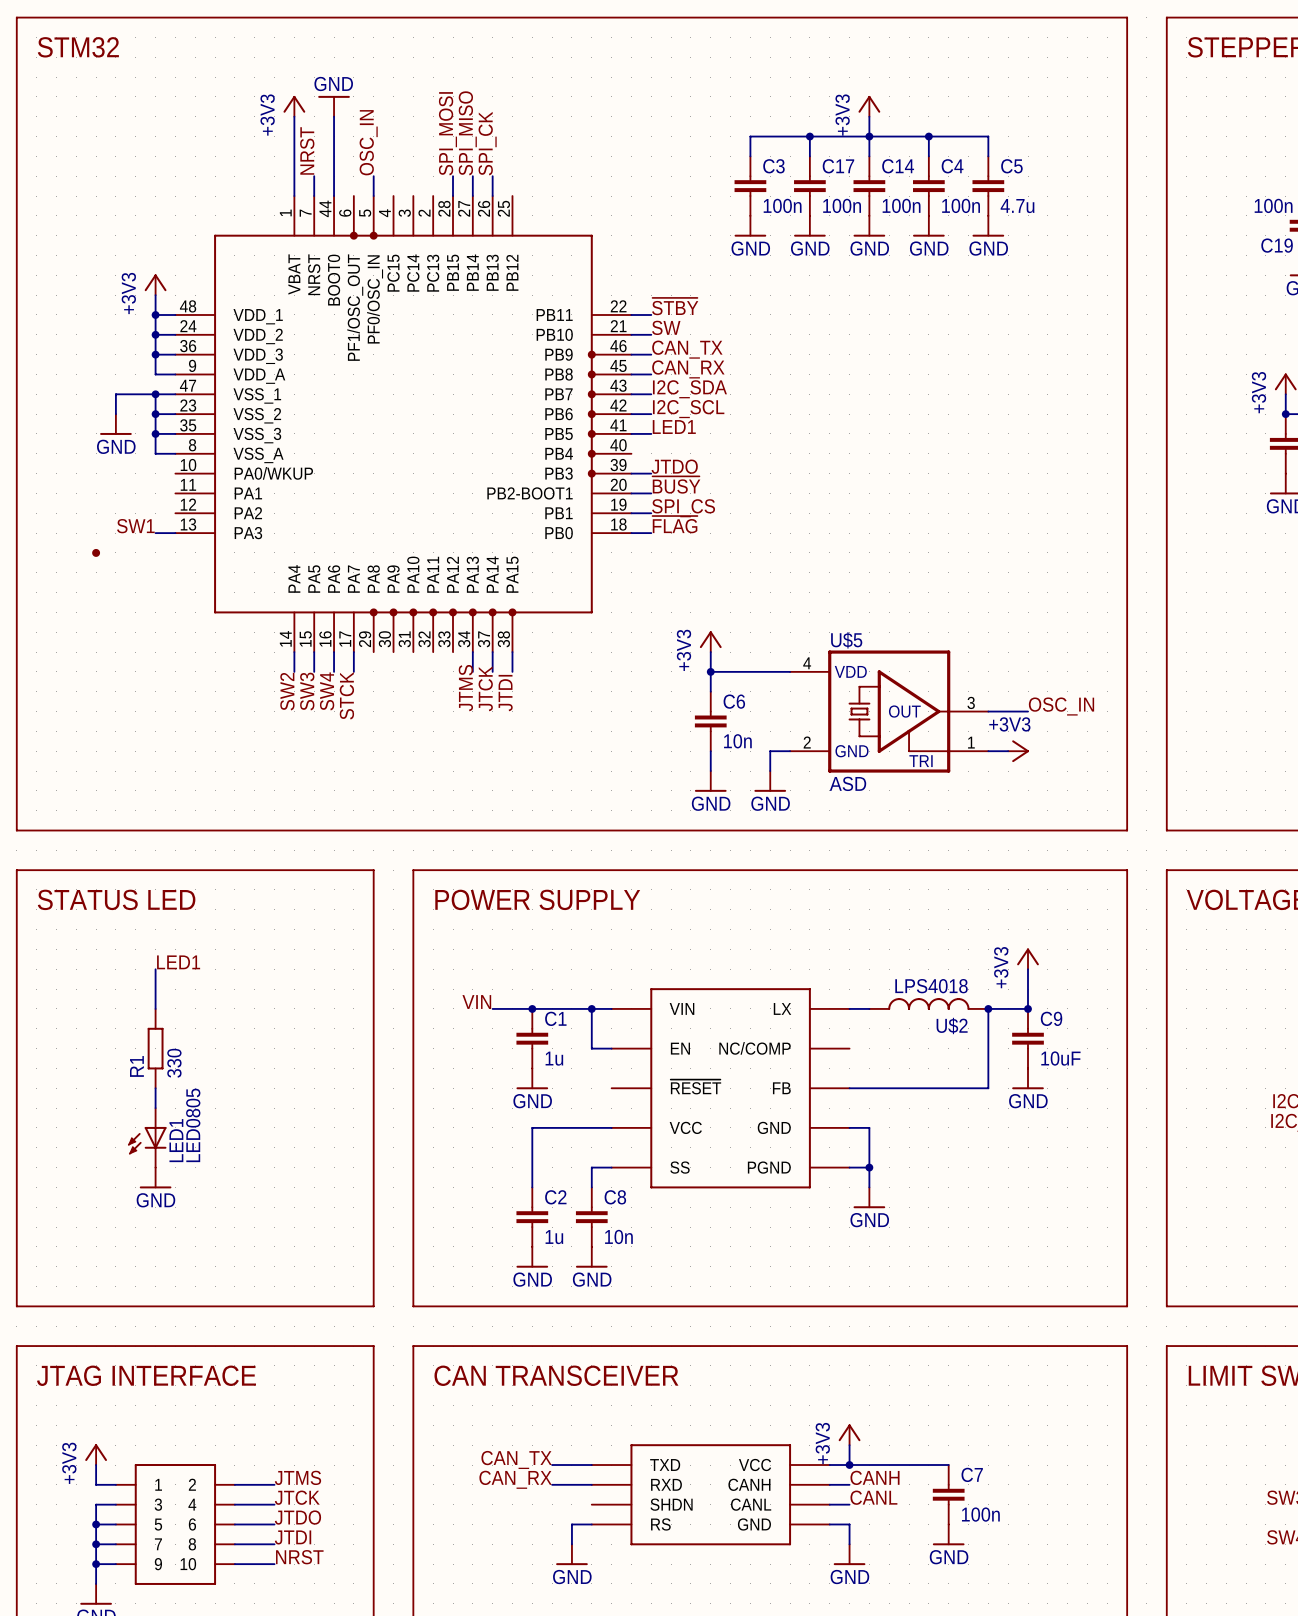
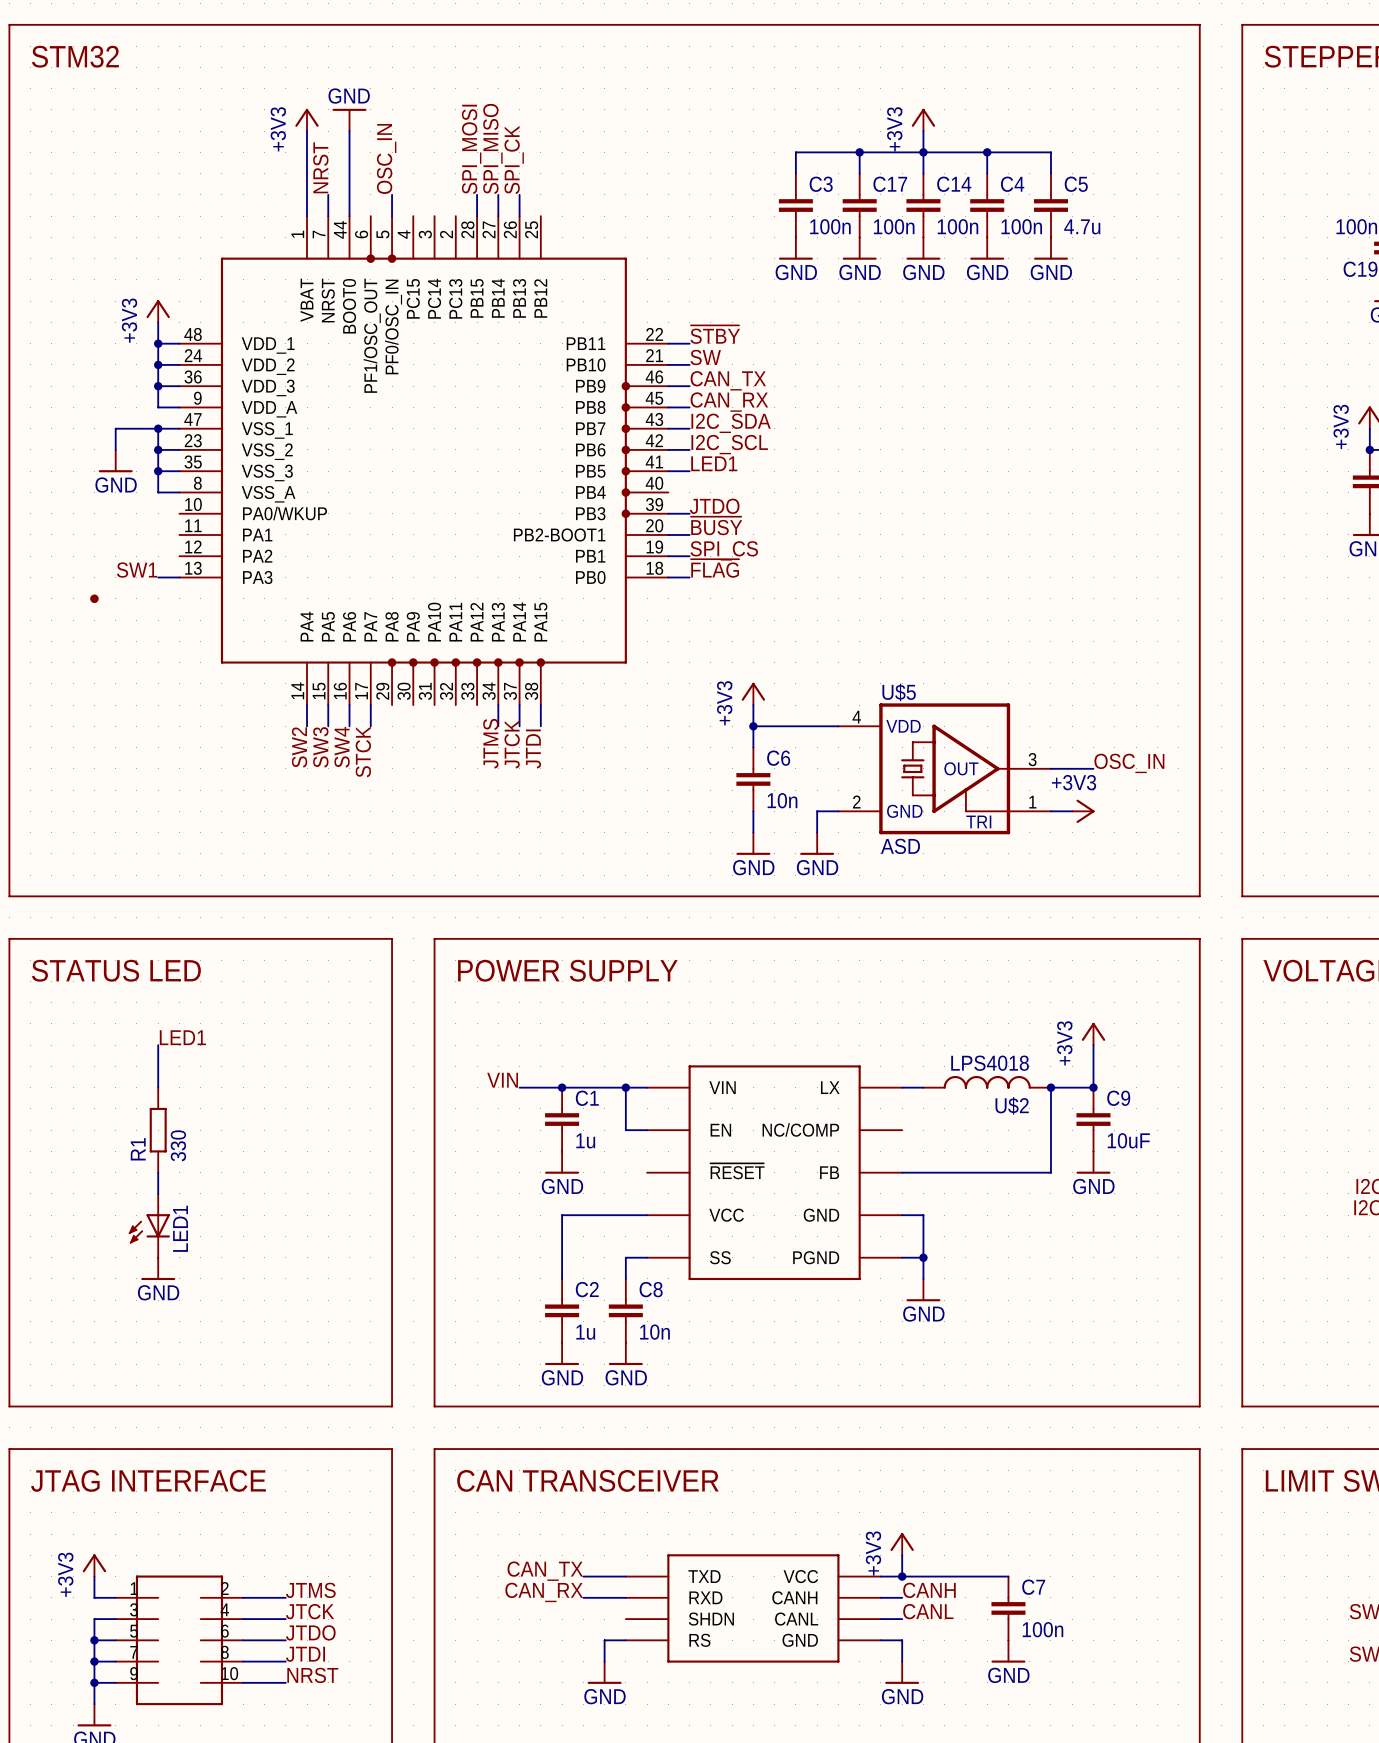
LED1 value: LED0805 (193, 1125) -> none
part symbol: [115, 1464, 235, 1585] -> [115, 1575, 244, 1706]

